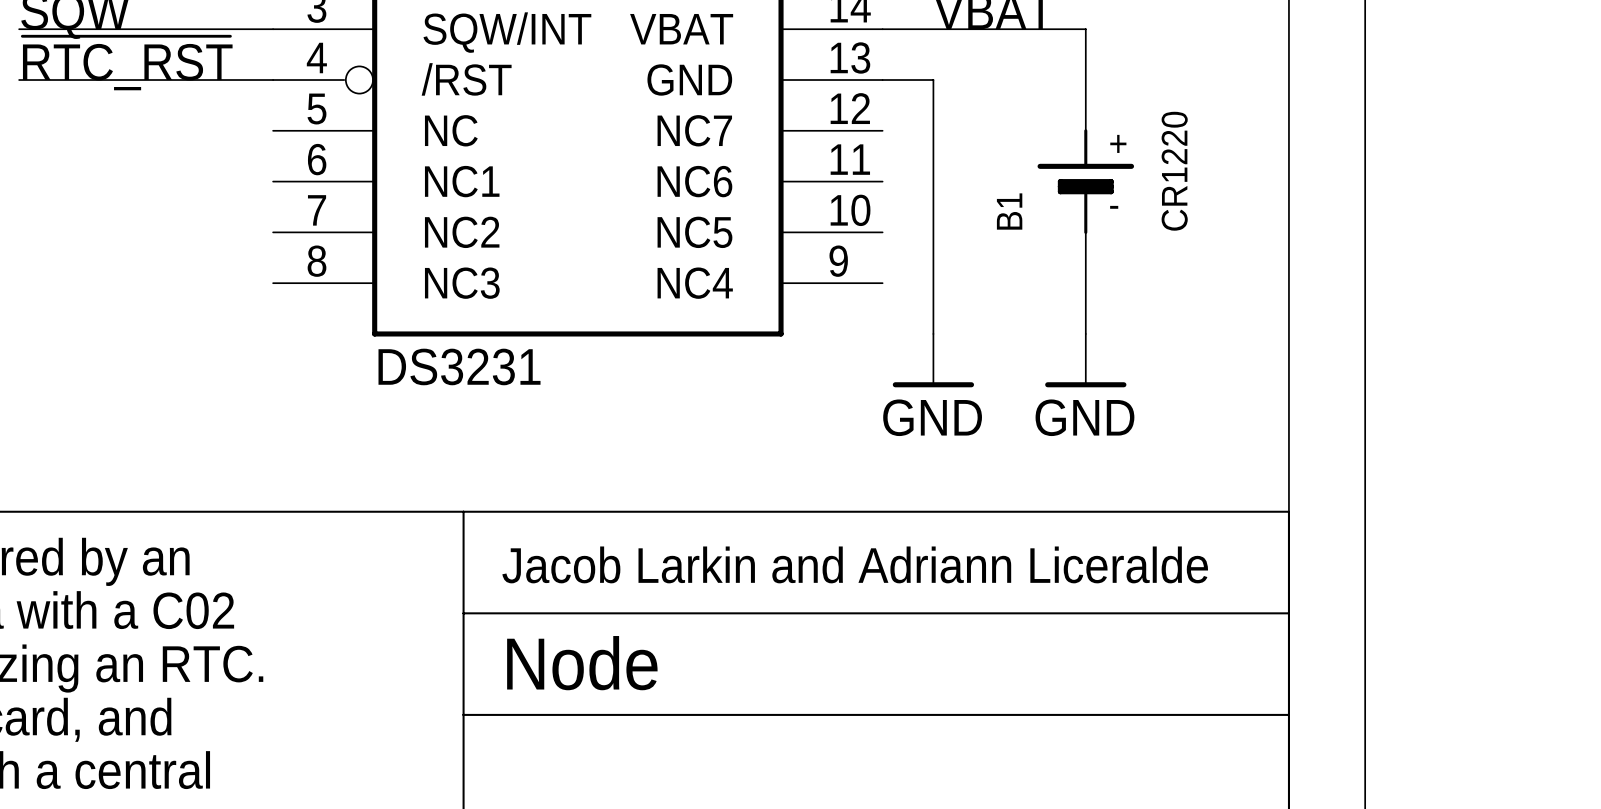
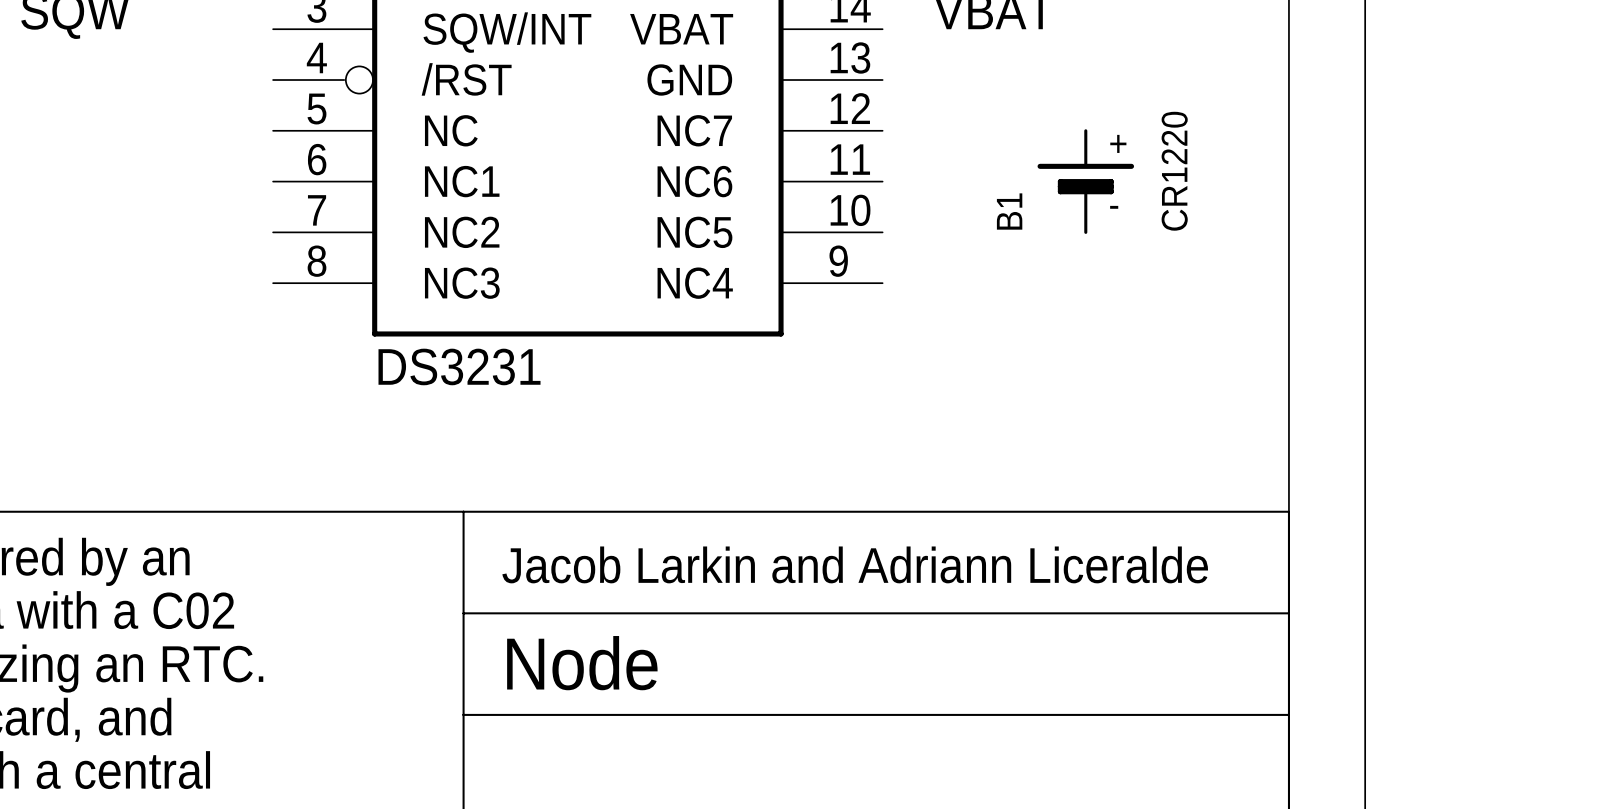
wire: (19, 29) (273, 29) -> none
wire: (882, 29) (1085, 29) (1085, 130) -> none
label: ~{RTC_RST} (127, 63) -> none
wire: (19, 80) (273, 80) -> none
wire: (882, 80) (933, 80) (933, 333) -> none
wire: (1085, 232) (1085, 333) -> none
power symbol: GND (933, 360) -> none
power symbol: GND (1085, 360) -> none

